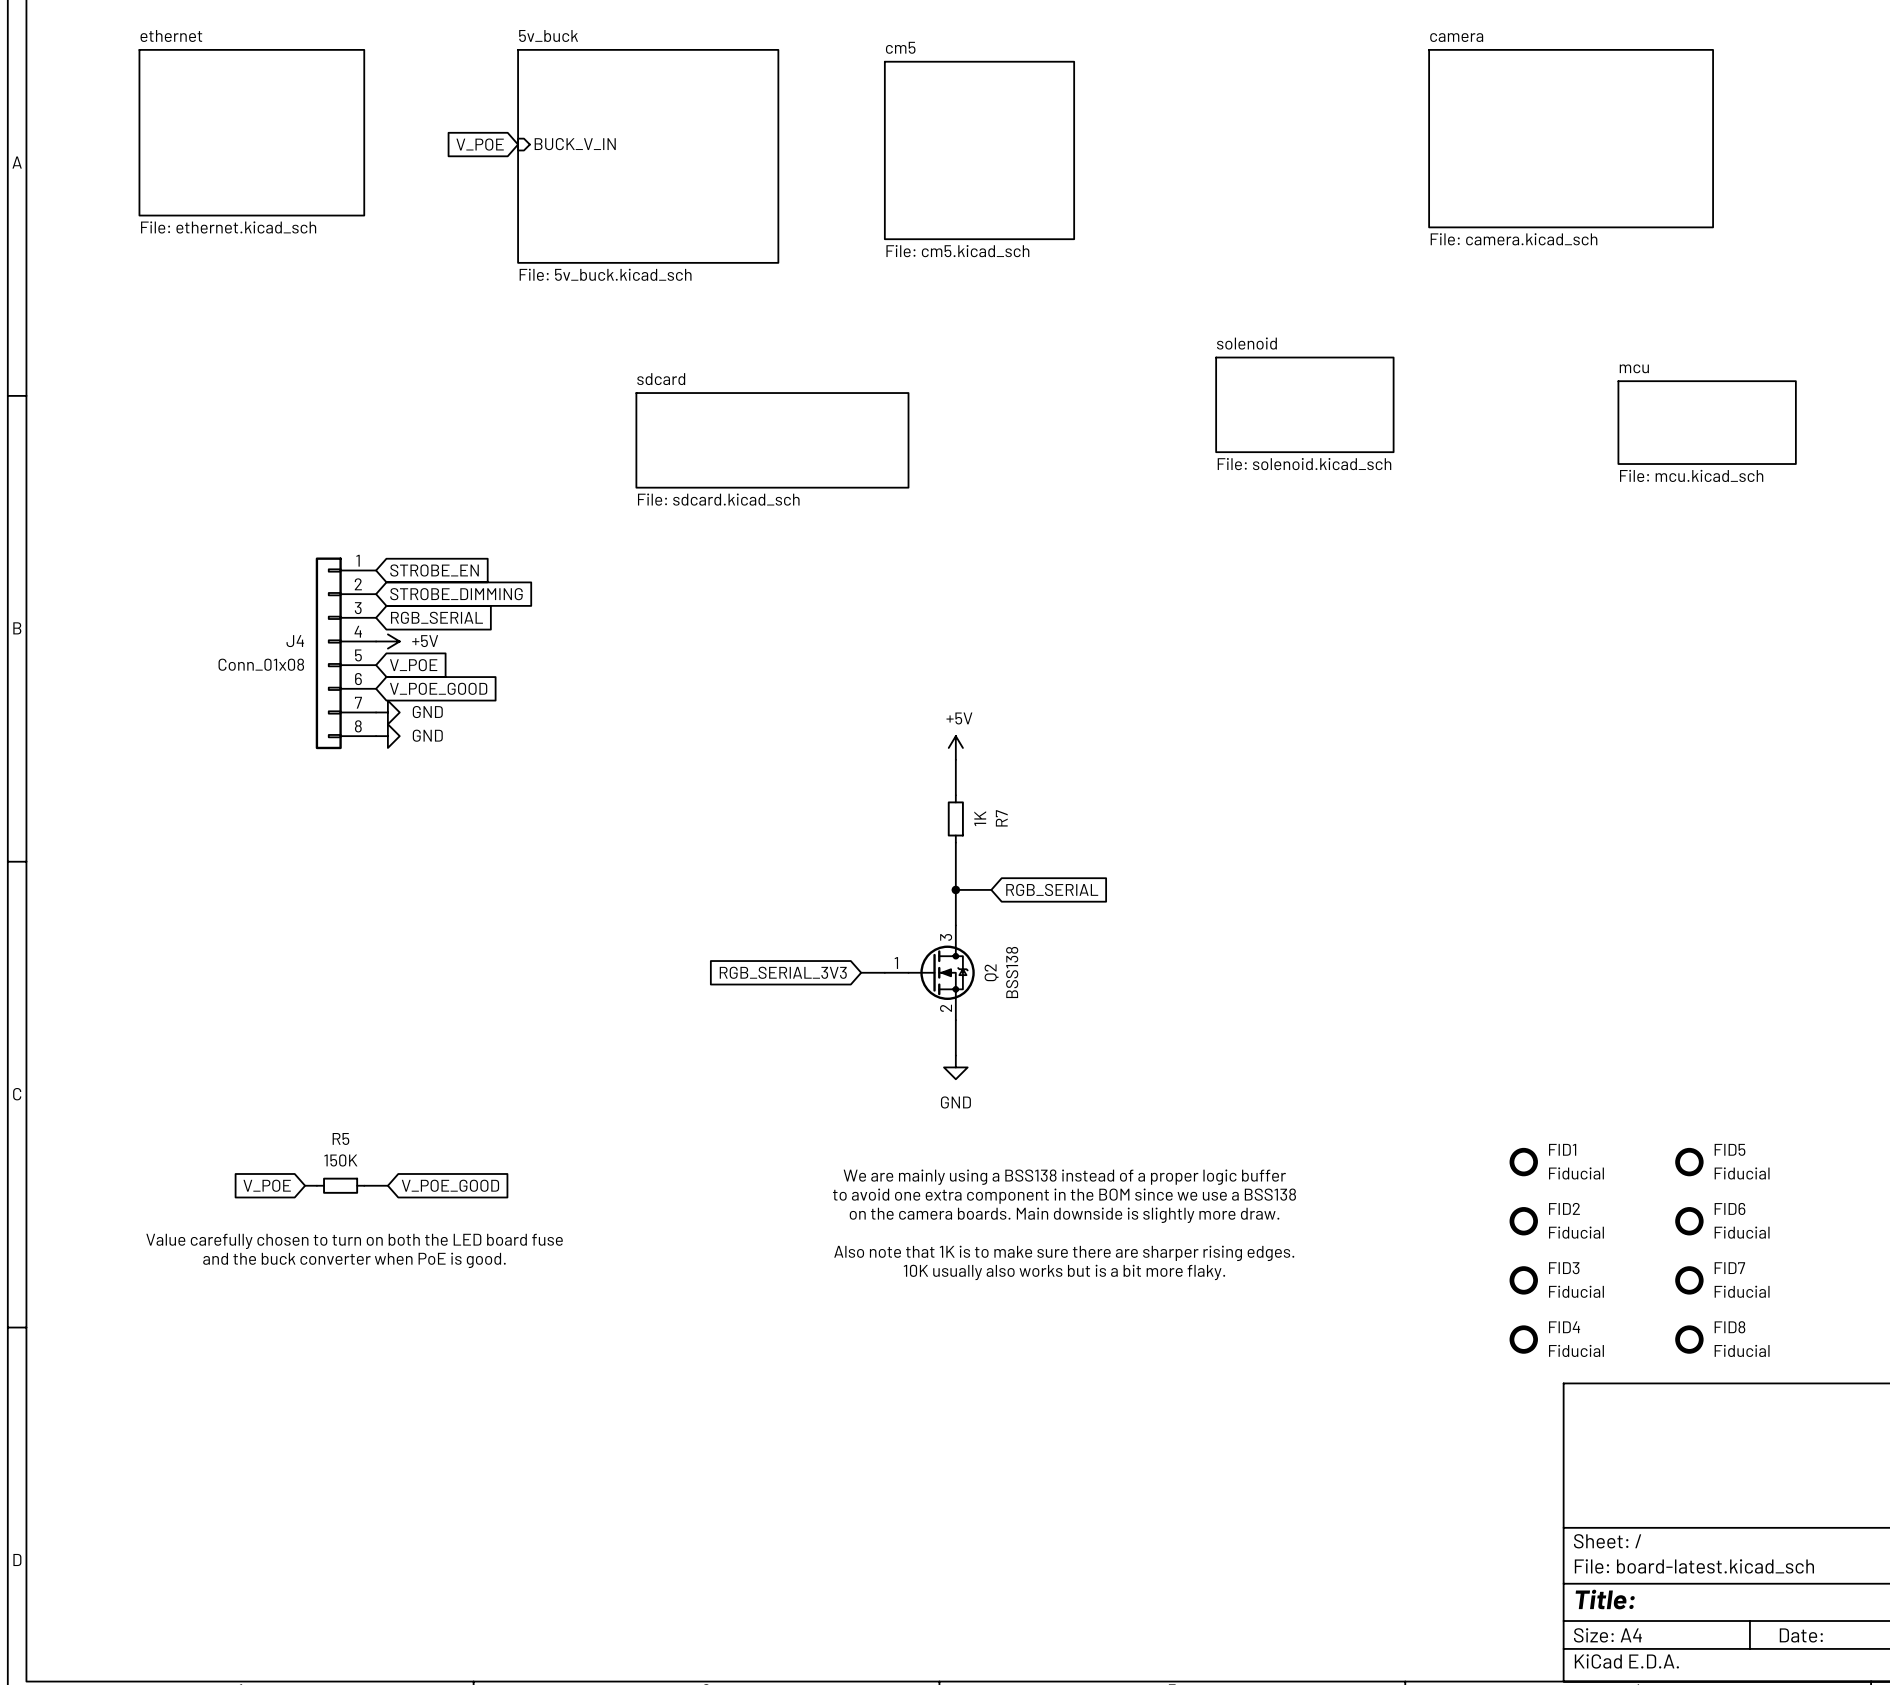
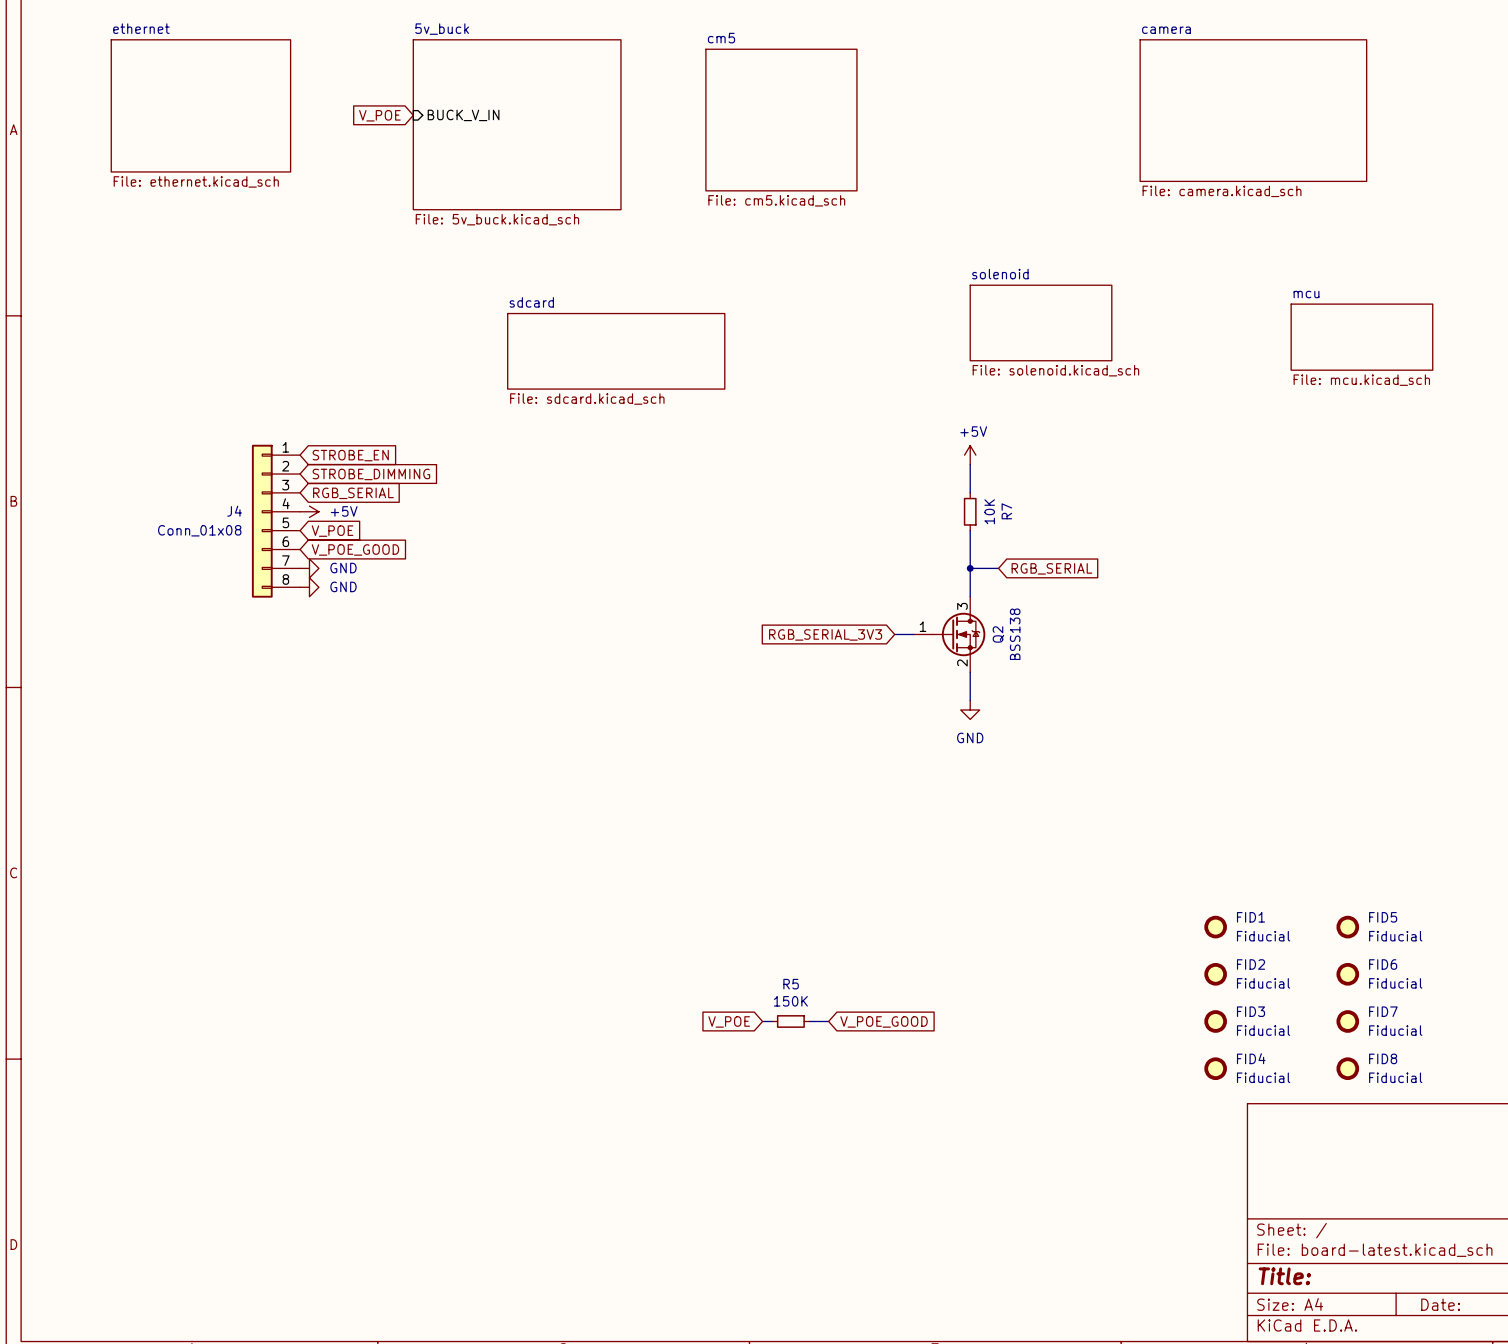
power symbol: none -> +5V (970, 455)
wire: none -> (970, 464) (970, 492)
wire: none -> (970, 530) (970, 596)
wire: none -> (970, 568) (998, 568)
junction: none -> (970, 568)
global label: none -> RGB_SERIAL (1051, 568)
power symbol: +5V (955, 747) -> none
wire: (955, 759) (955, 795) -> none
global label: none -> RGB_SERIAL_3V3 (825, 634)
wire: none -> (894, 634) (913, 634)
R7 position: (955, 818) -> (970, 511)
R7 value: 1K (980, 818) -> 10K (989, 511)
wire: (955, 842) (955, 925) -> none
wire: none -> (970, 672) (970, 700)
wire: (955, 889) (991, 889) -> none
junction: (955, 889) -> none
global label: RGB_SERIAL (1052, 889) -> none
power symbol: none -> GND (970, 709)
global label: RGB_SERIAL_3V3 (783, 972) -> none
wire: (861, 972) (884, 972) -> none
Q2 position: (929, 972) -> (949, 634)
wire: (955, 1020) (955, 1055) -> none
power symbol: GND (955, 1067) -> none
text: We are mainly using a BSS138 instead of a proper logic buffer (1064, 1177) -> none
global label: V_POE (267, 1185) -> none
wire: (305, 1185) (316, 1185) -> none
R5 position: (340, 1185) -> (790, 1021)
wire: (364, 1185) (387, 1185) -> none
global label: V_POE_GOOD (450, 1185) -> none
text: to avoid one extra component in the BOM since we use a BSS138 (1064, 1196) -> none
text: on the camera boards. Main downside is slightly more draw. (1064, 1215) -> none
text: Value carefully chosen to turn on both the LED board fuse (354, 1241) -> none
text: Also note that 1K is to make sure there are sharper rising edges. (1064, 1253) -> none
text: and the buck converter when PoE is good. (354, 1260) -> none
text: 10K usually also works but is a bit more flaky. (1064, 1272) -> none
global label: none -> V_POE (729, 1021)
wire: none -> (762, 1021) (772, 1021)
wire: none -> (809, 1021) (828, 1021)
global label: none -> V_POE_GOOD (884, 1021)

